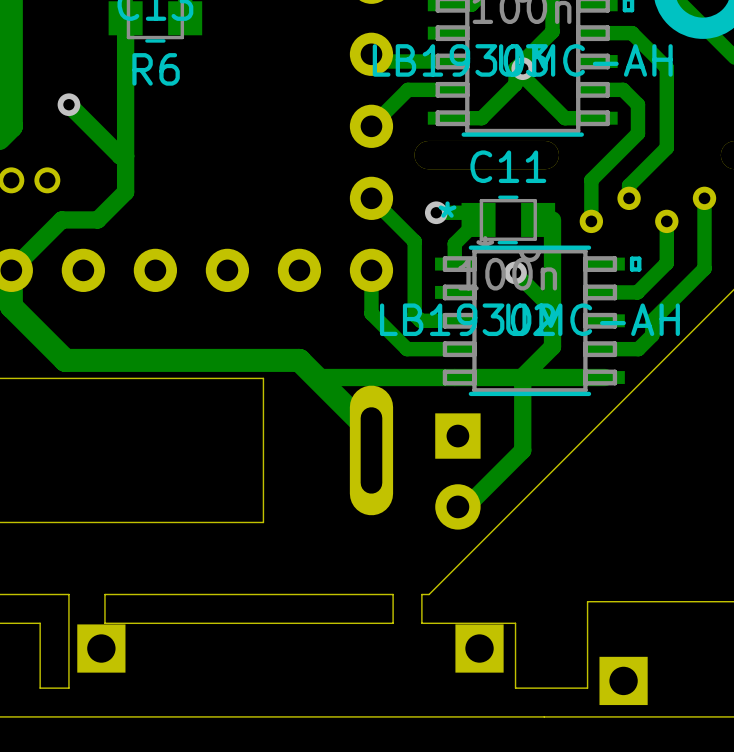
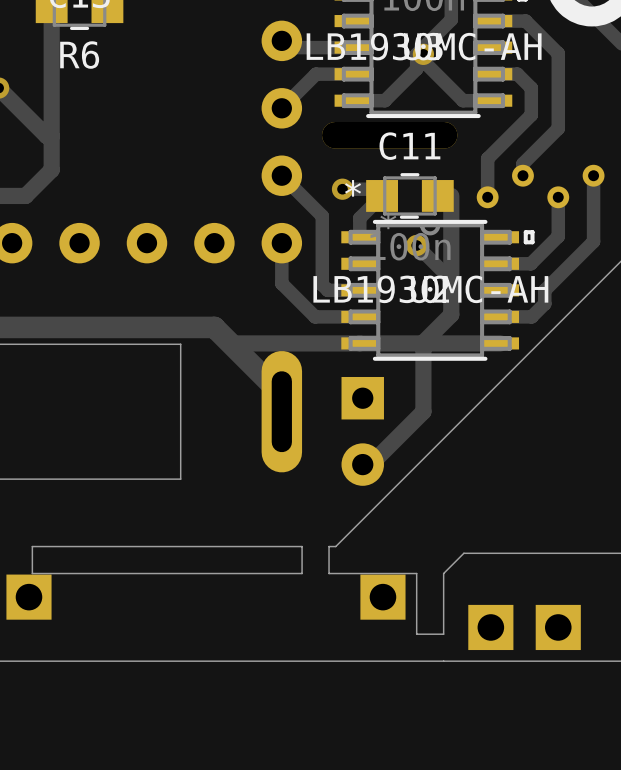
board edge: (587, 601) (587, 688) (544, 688) -> (484, 553) (463, 553) (443, 573) (443, 634)
part: none -> (490, 627)
part: (623, 680) -> none
part: none -> (558, 627)

